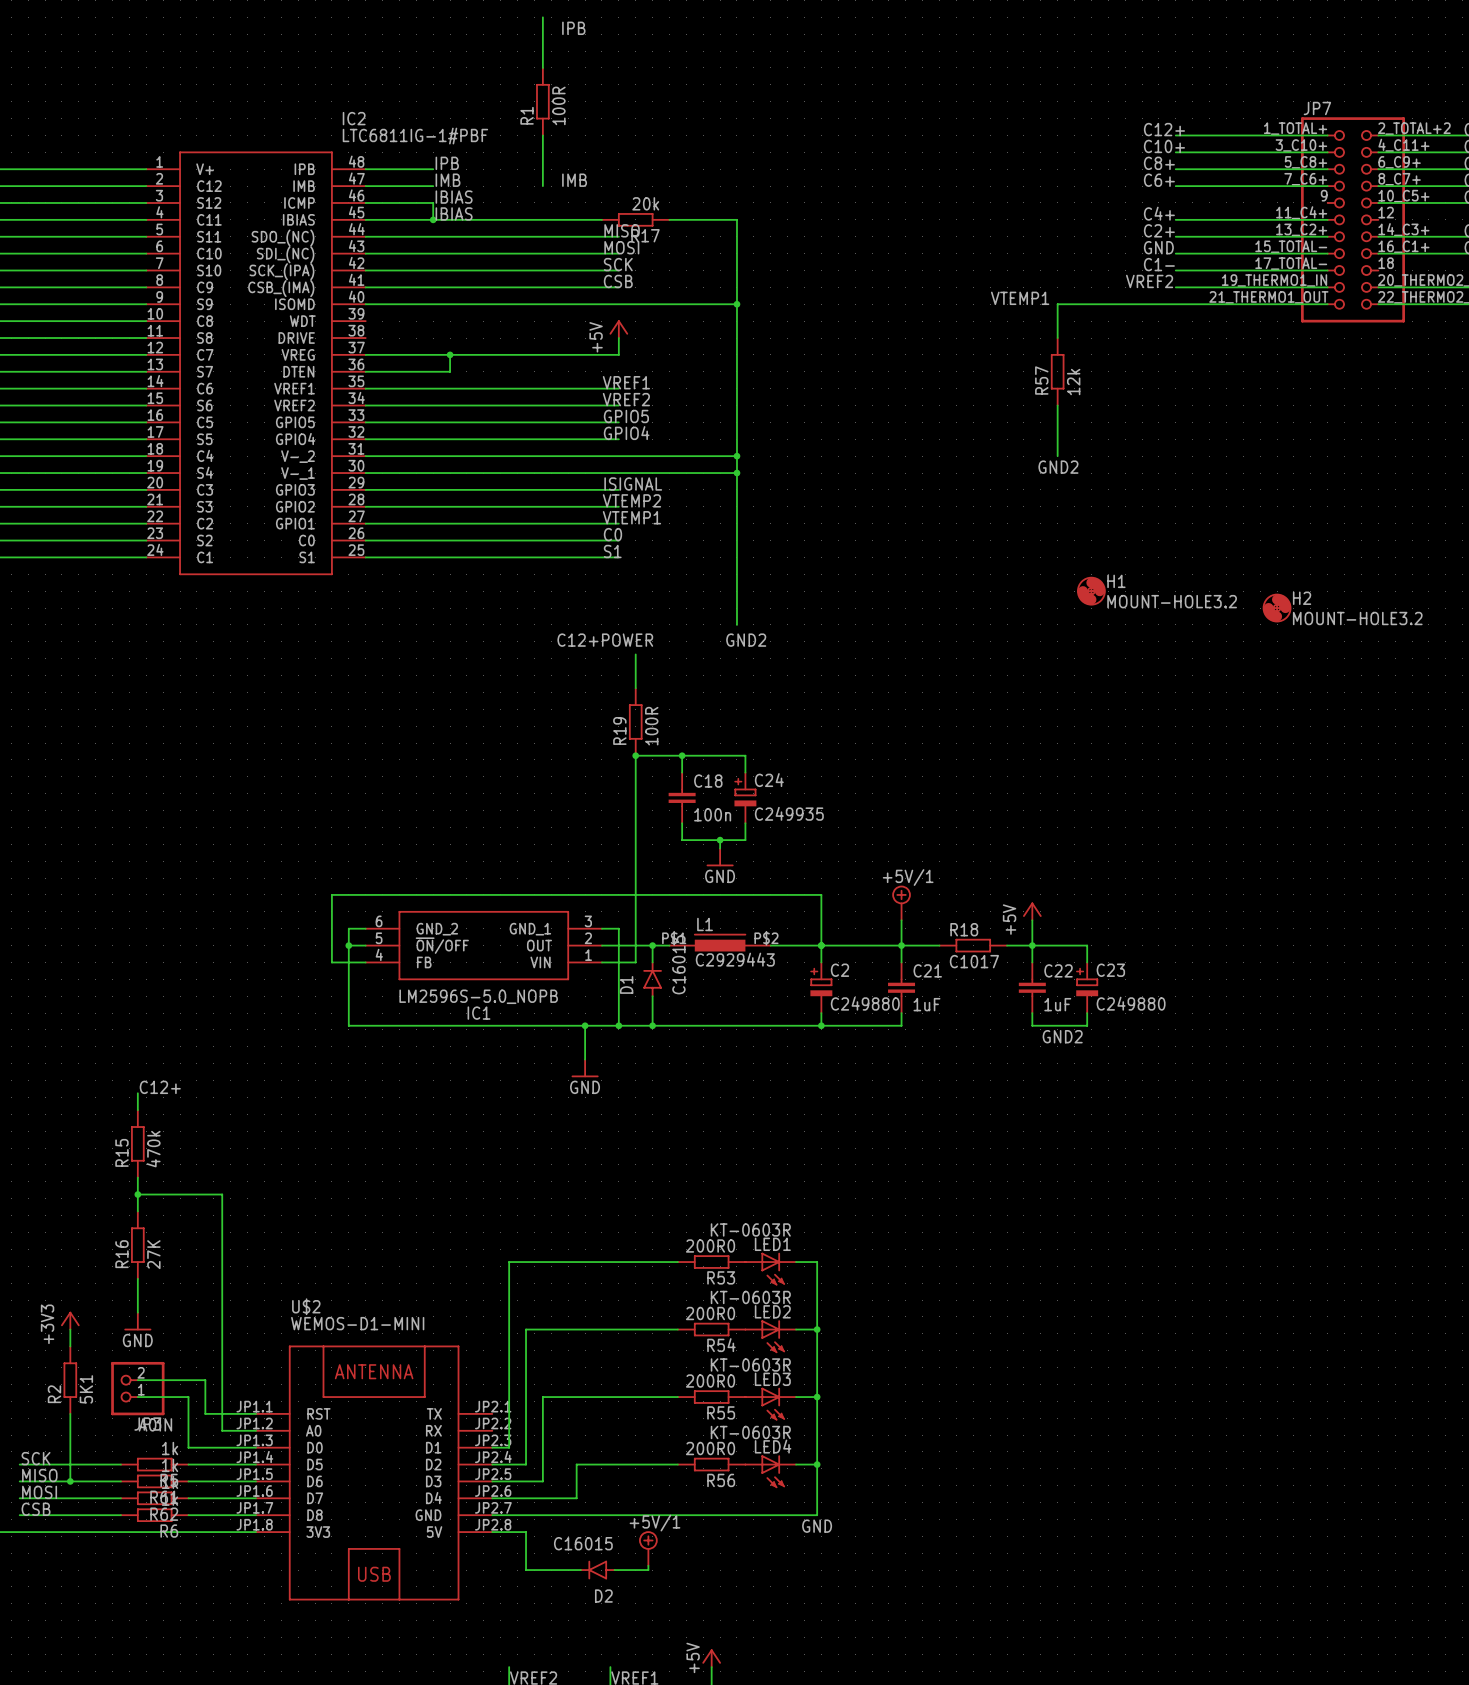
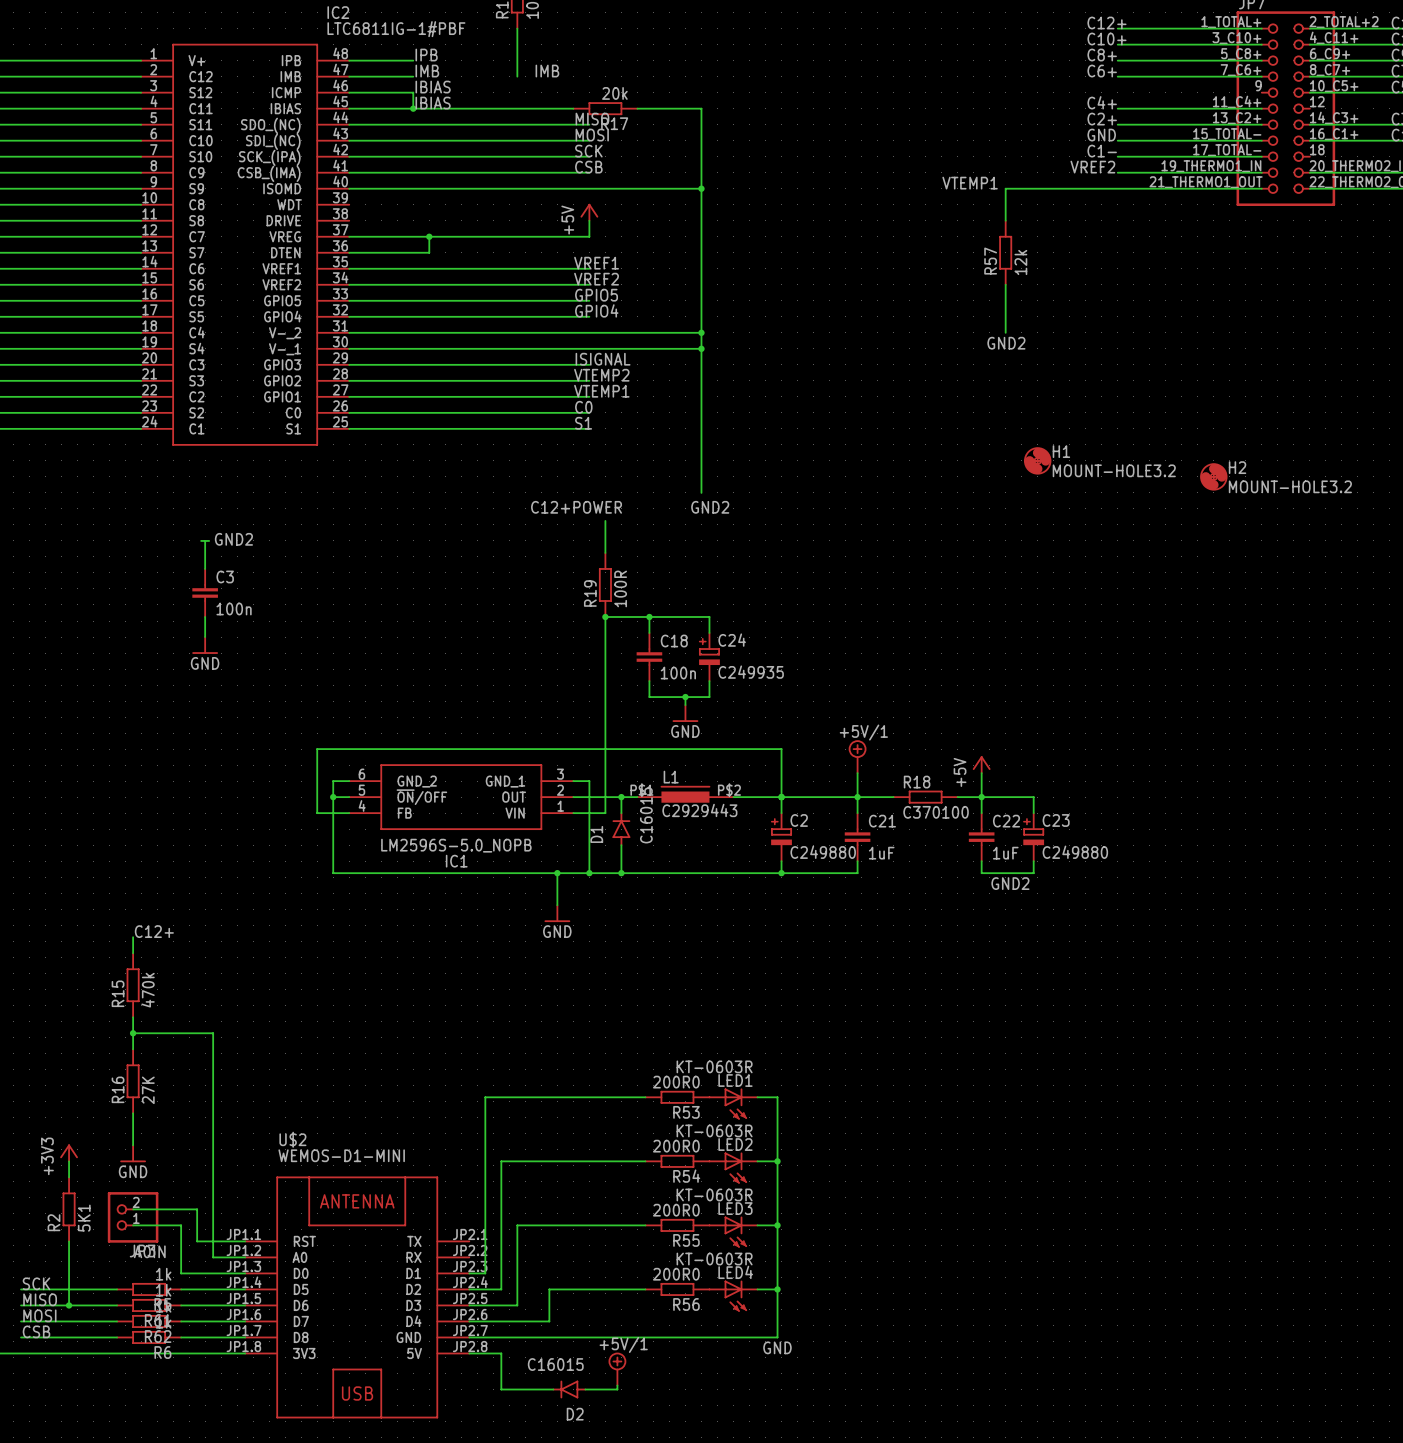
label: none -> GND2 (233, 539)
wire: none -> (201, 540) (209, 540)
wire: none -> (205, 540) (205, 568)
C3: none -> 100n (205, 592)
wire: none -> (205, 617) (205, 637)
power symbol: none -> GND (205, 645)
R18 value: C1017 (974, 961) -> C370100 (936, 812)

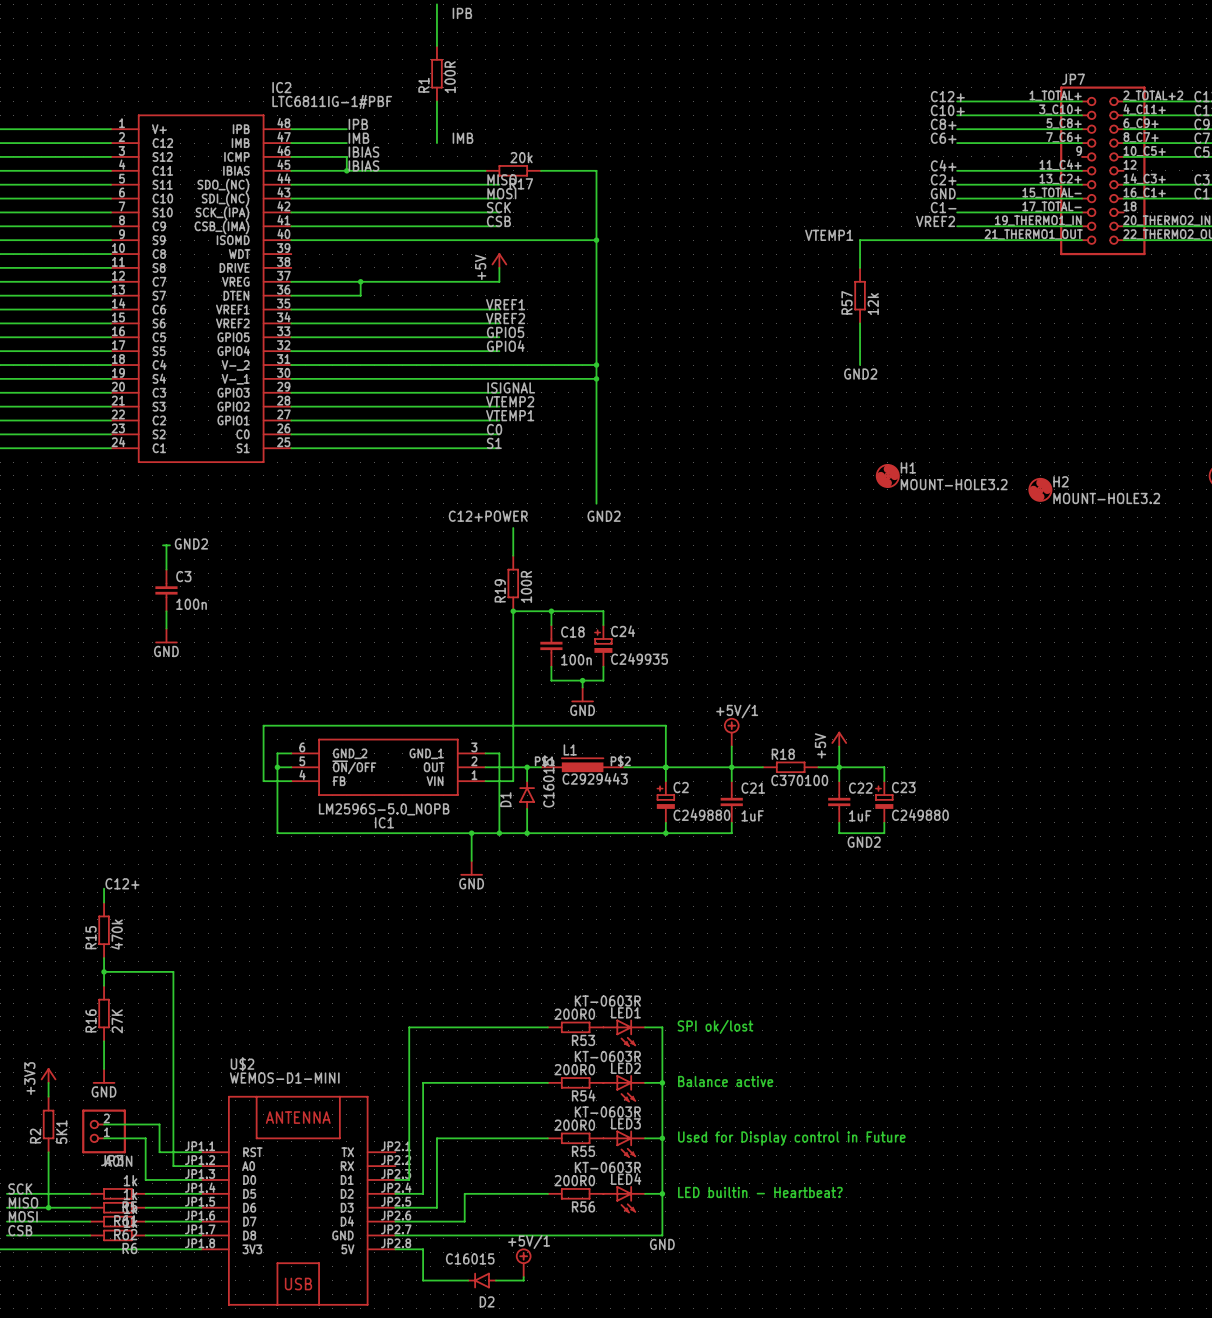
text: none -> SPI ok/lost (715, 1026)
text: none -> Balance active (725, 1081)
text: none -> Used for Display control in Future (791, 1138)
text: none -> LED builtin - Heartbeat? (760, 1192)

